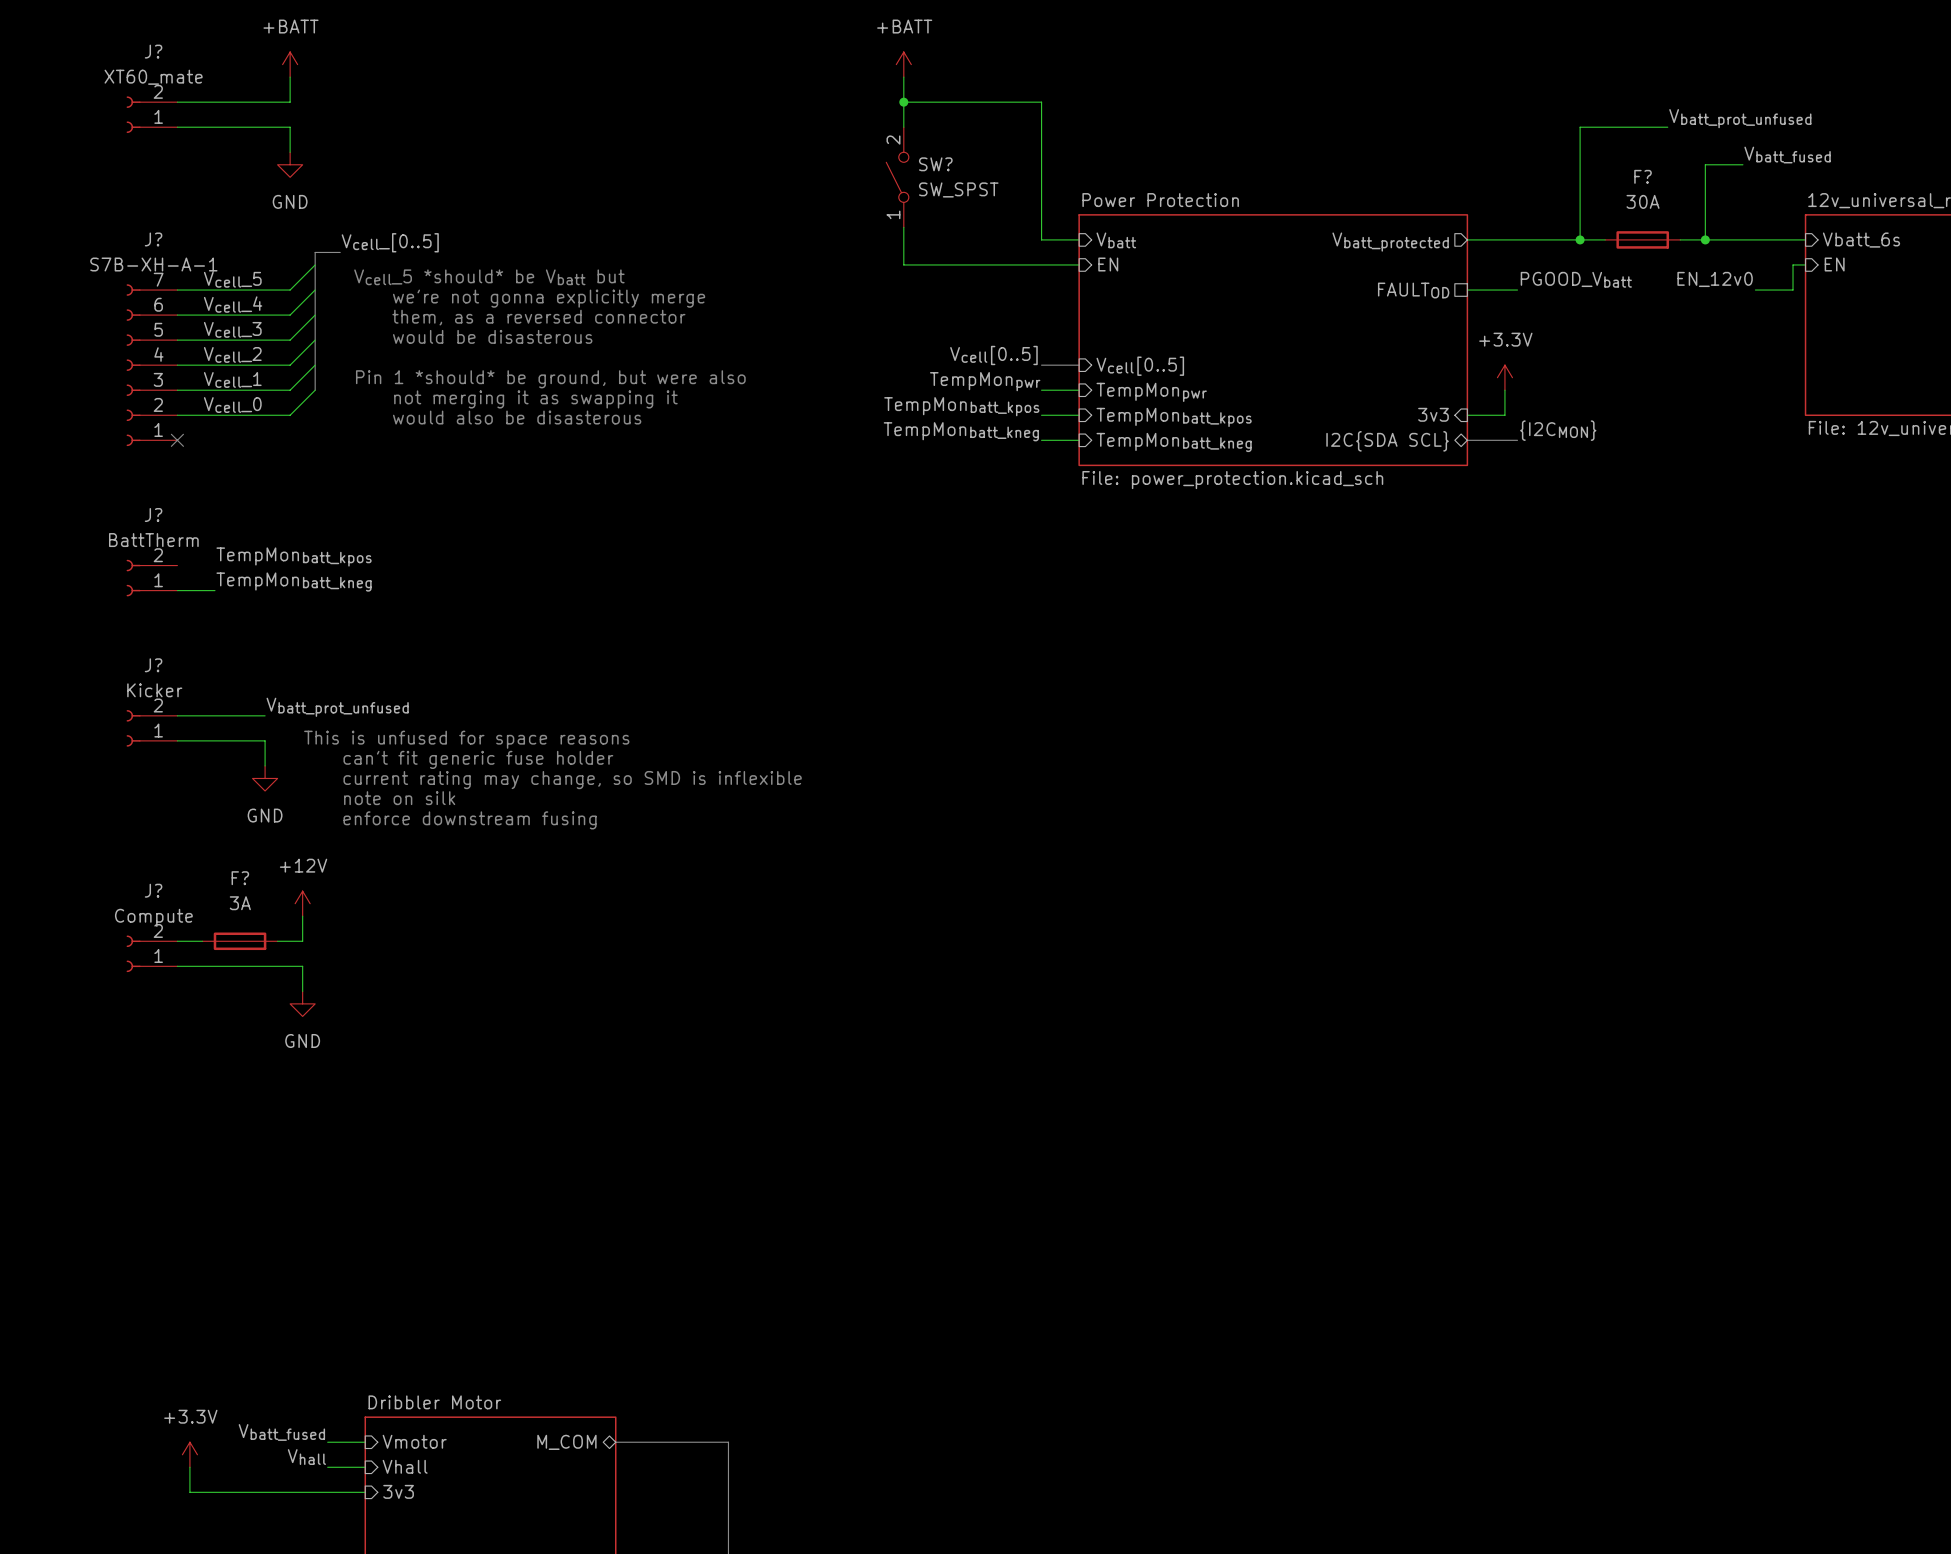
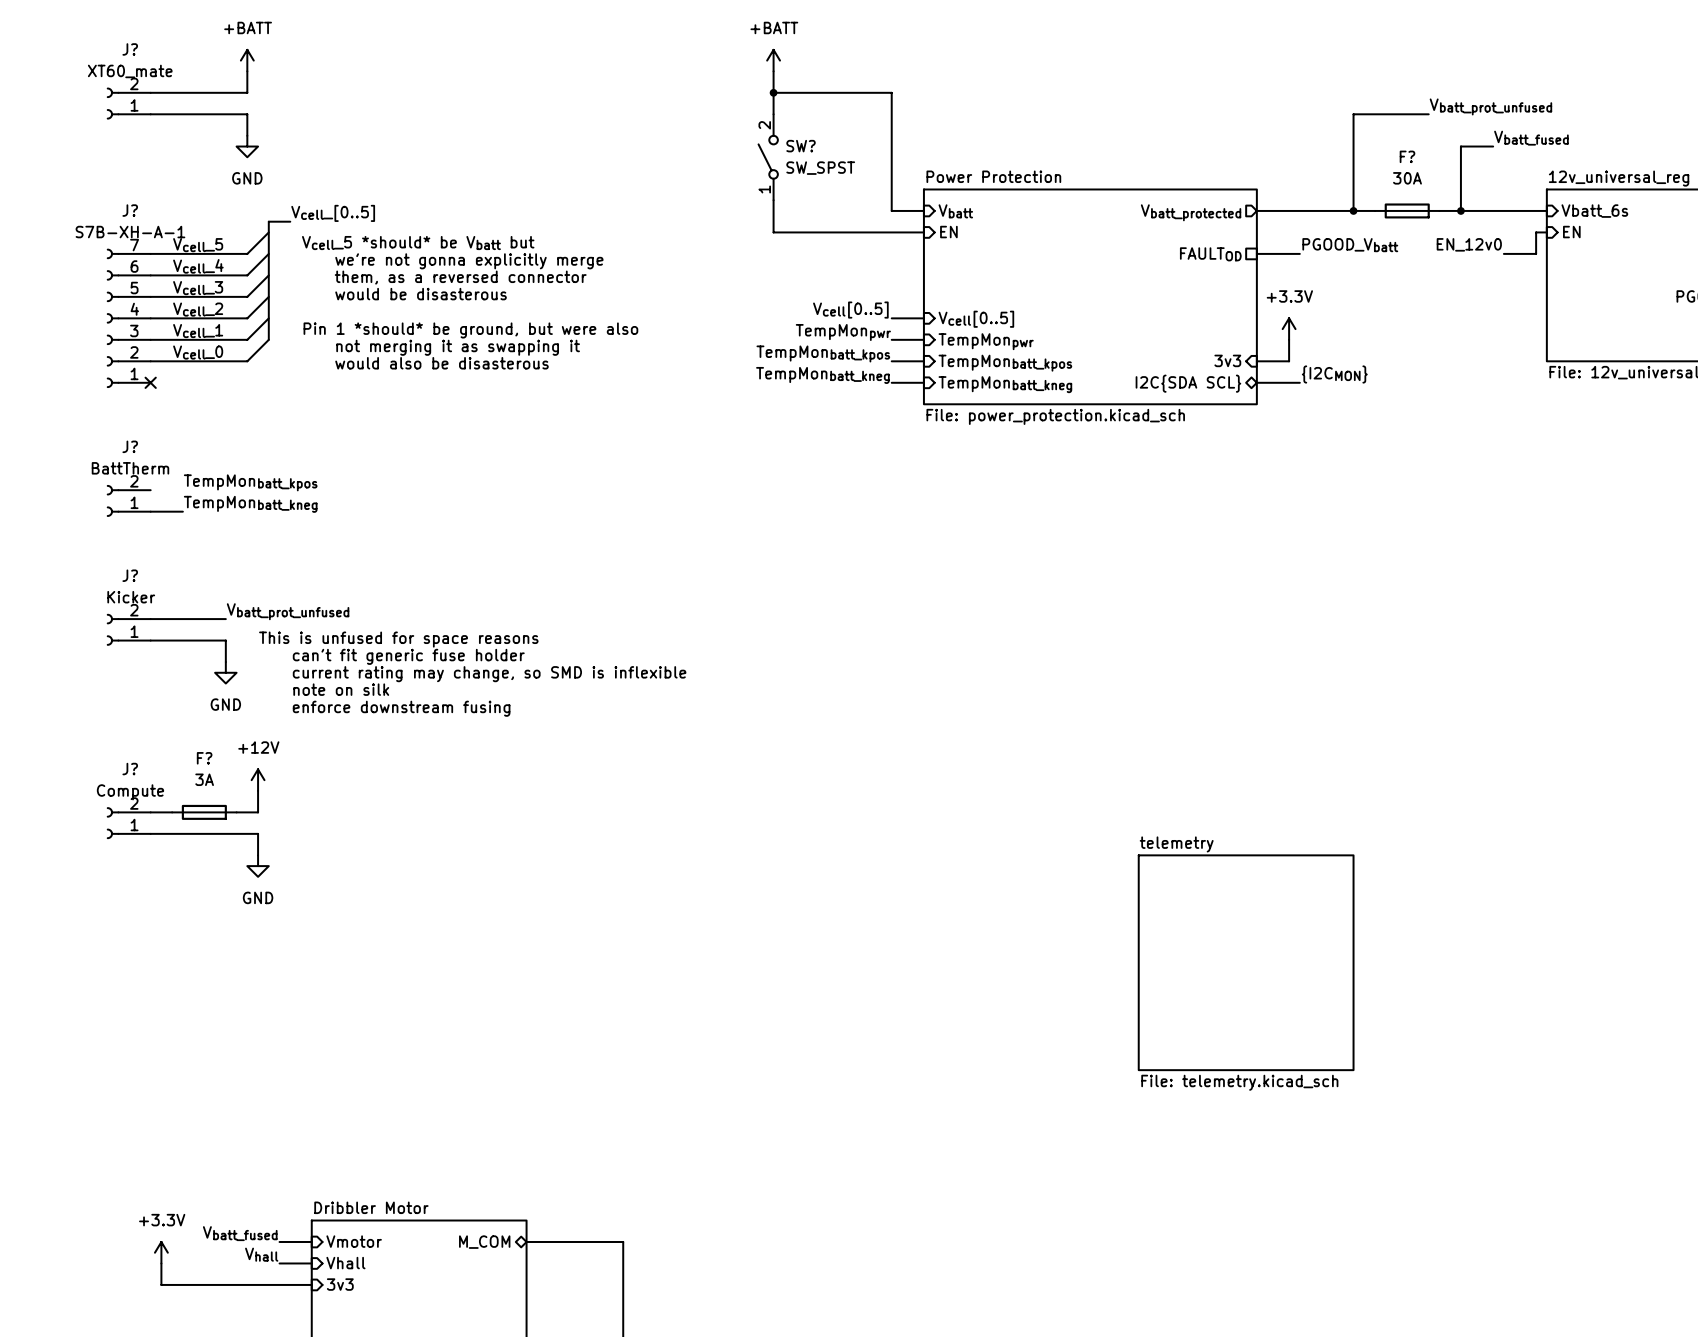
sheet telemetry: none -> File: telemetry.kicad_sch (1246, 962)

